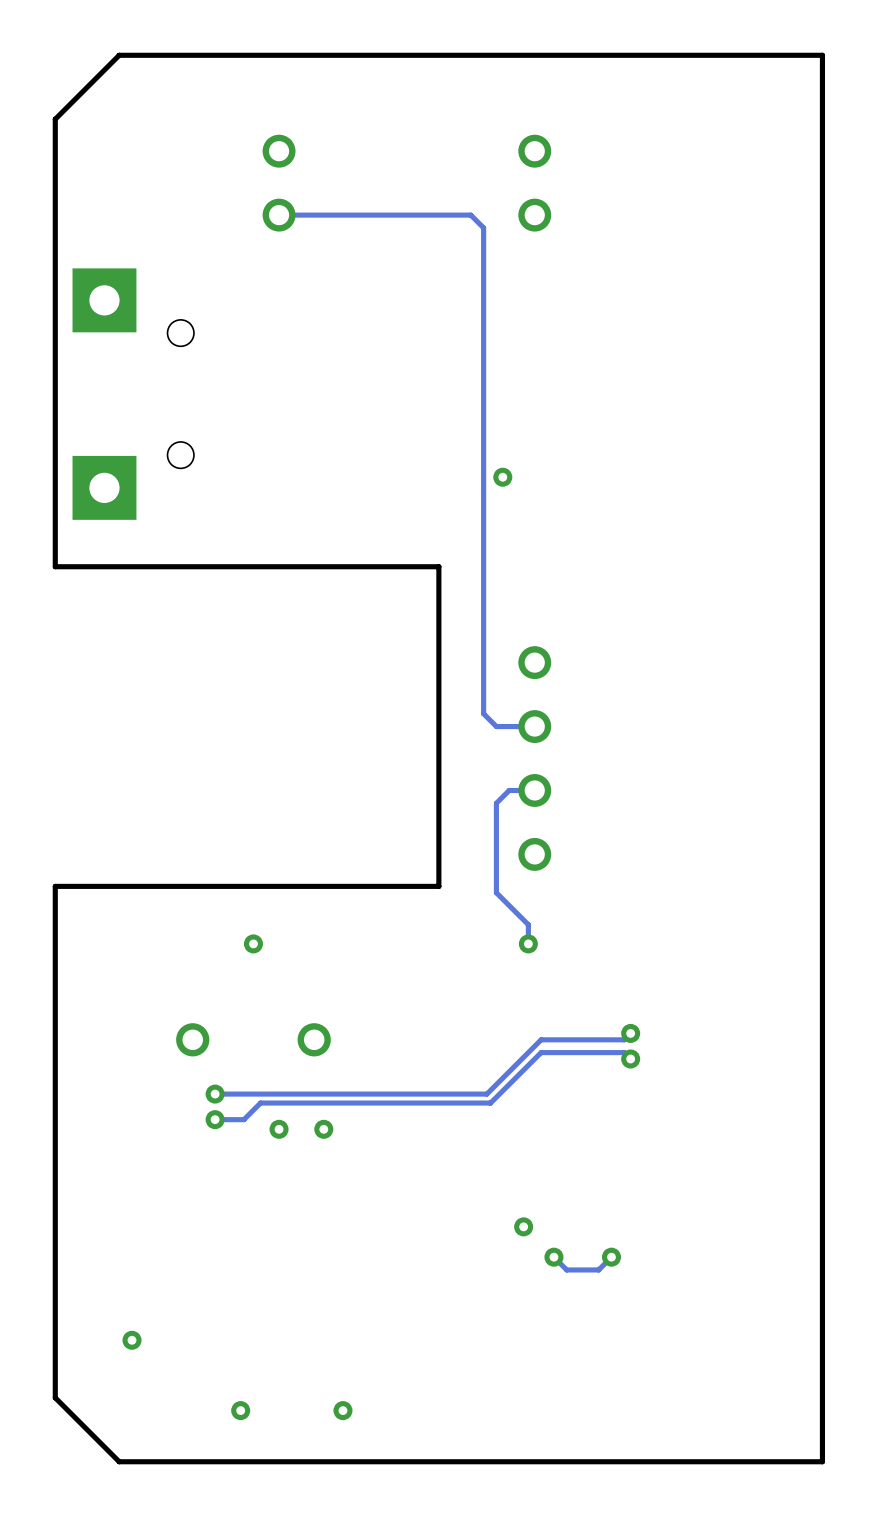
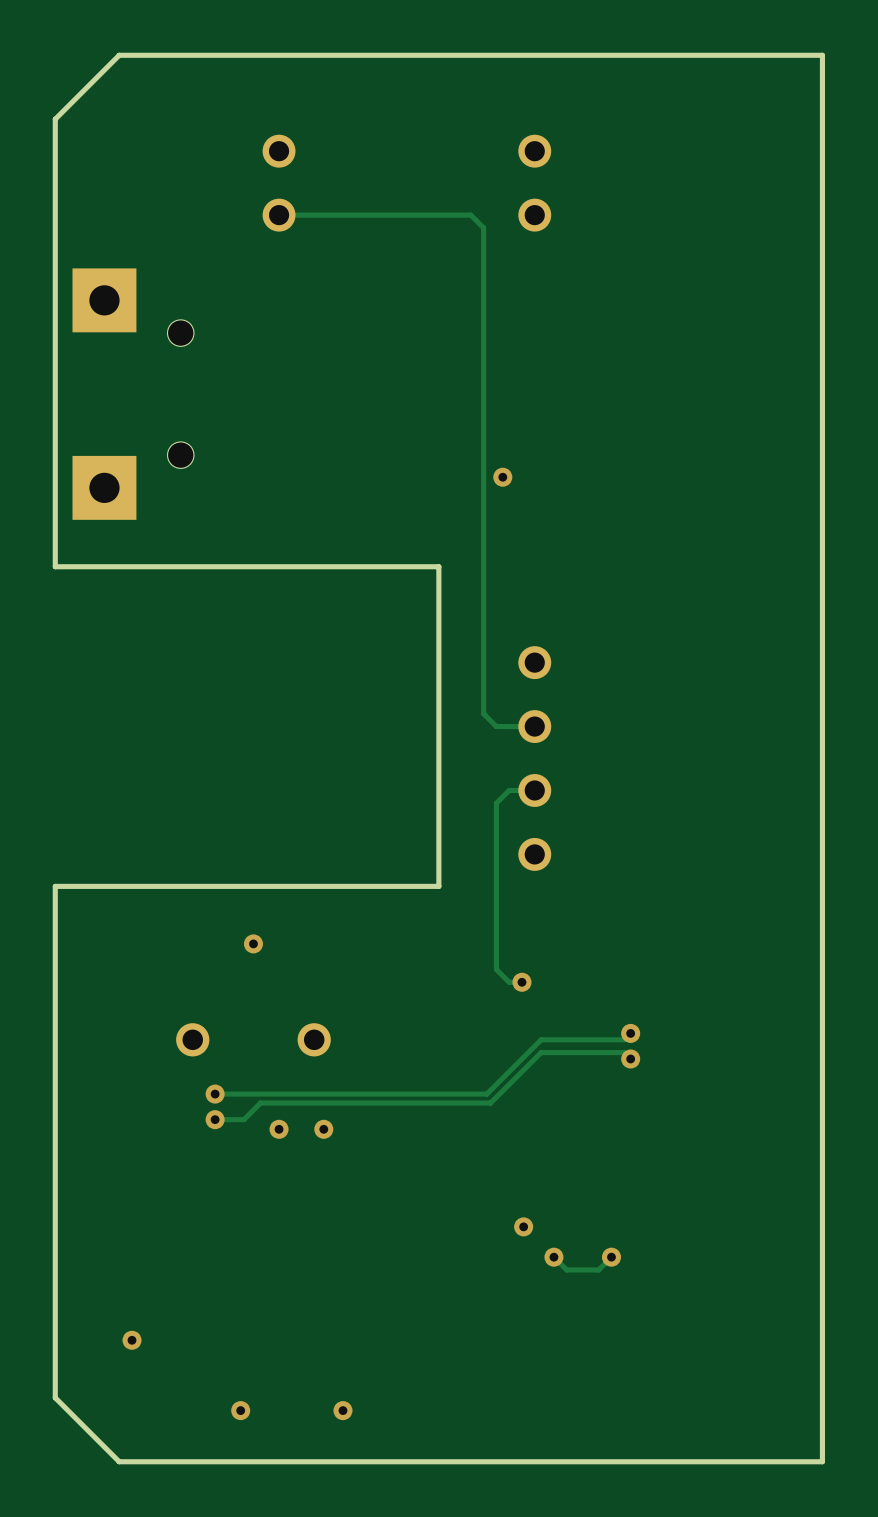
track: (496, 892) (528, 924) (528, 943) -> (496, 892) (496, 969) (509, 982) (521, 982)
via position: (528, 943) -> (521, 982)

